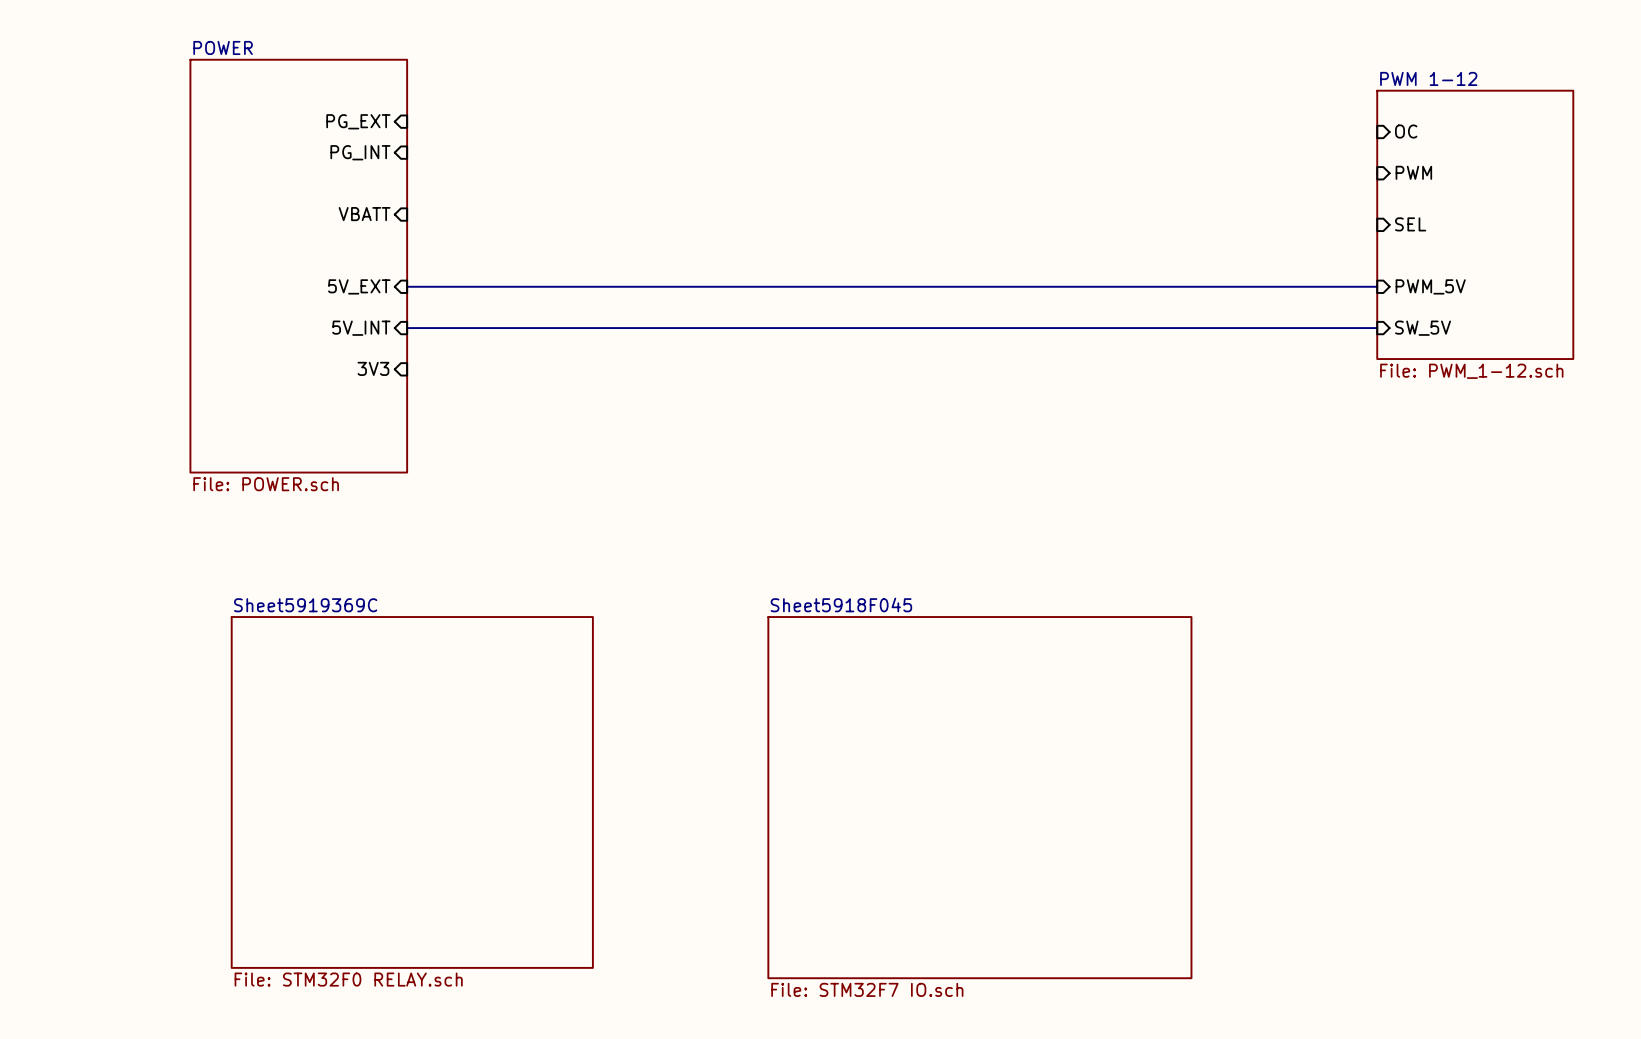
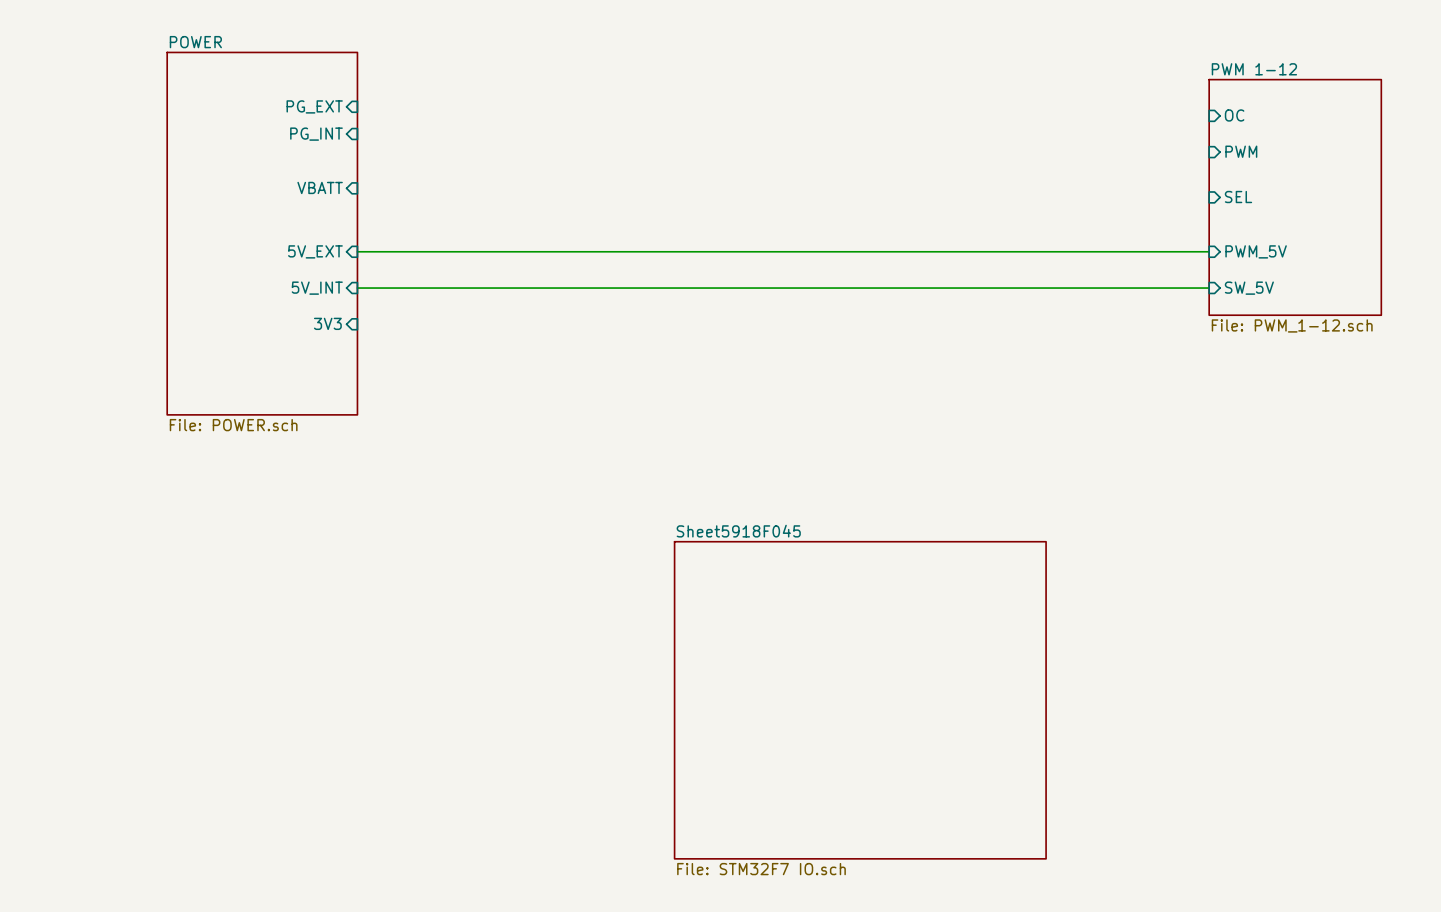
sheet Sheet5919369C: File: STM32F0 RELAY.sch (412, 792) -> none

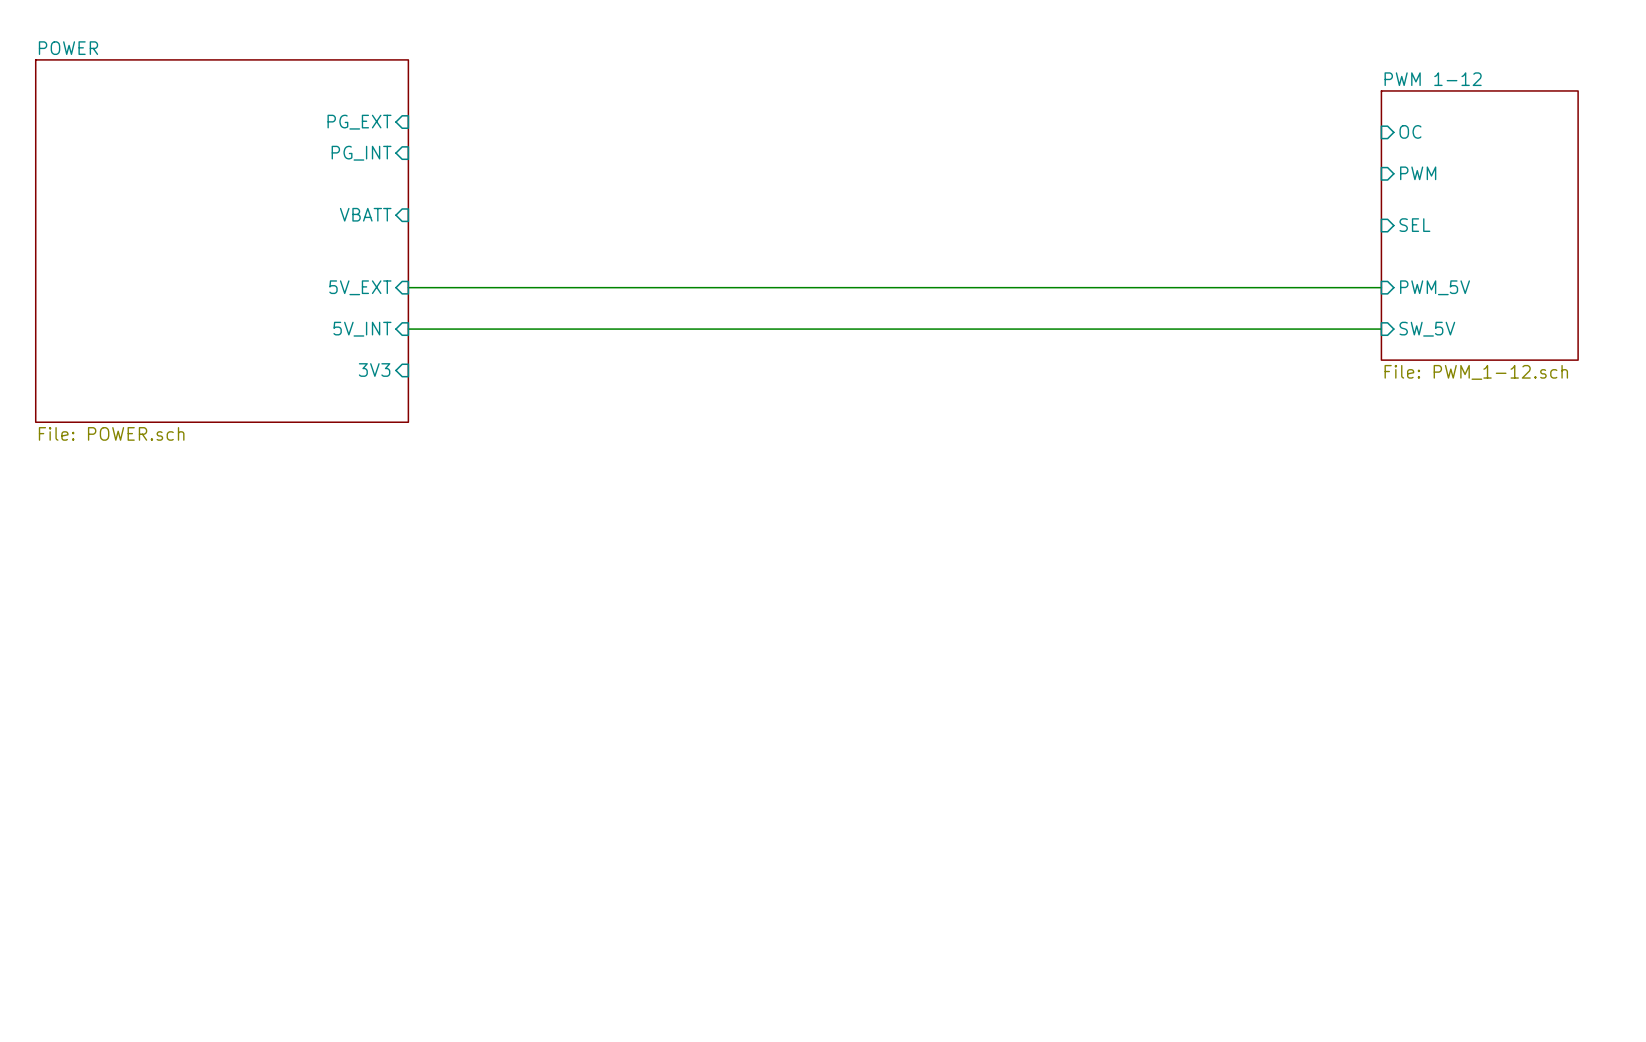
sheet POWER: none -> File: POWER.sch (222, 241)
sheet POWER: File: POWER.sch (262, 233) -> none
sheet Sheet5918F045: File: STM32F7 IO.sch (860, 700) -> none

